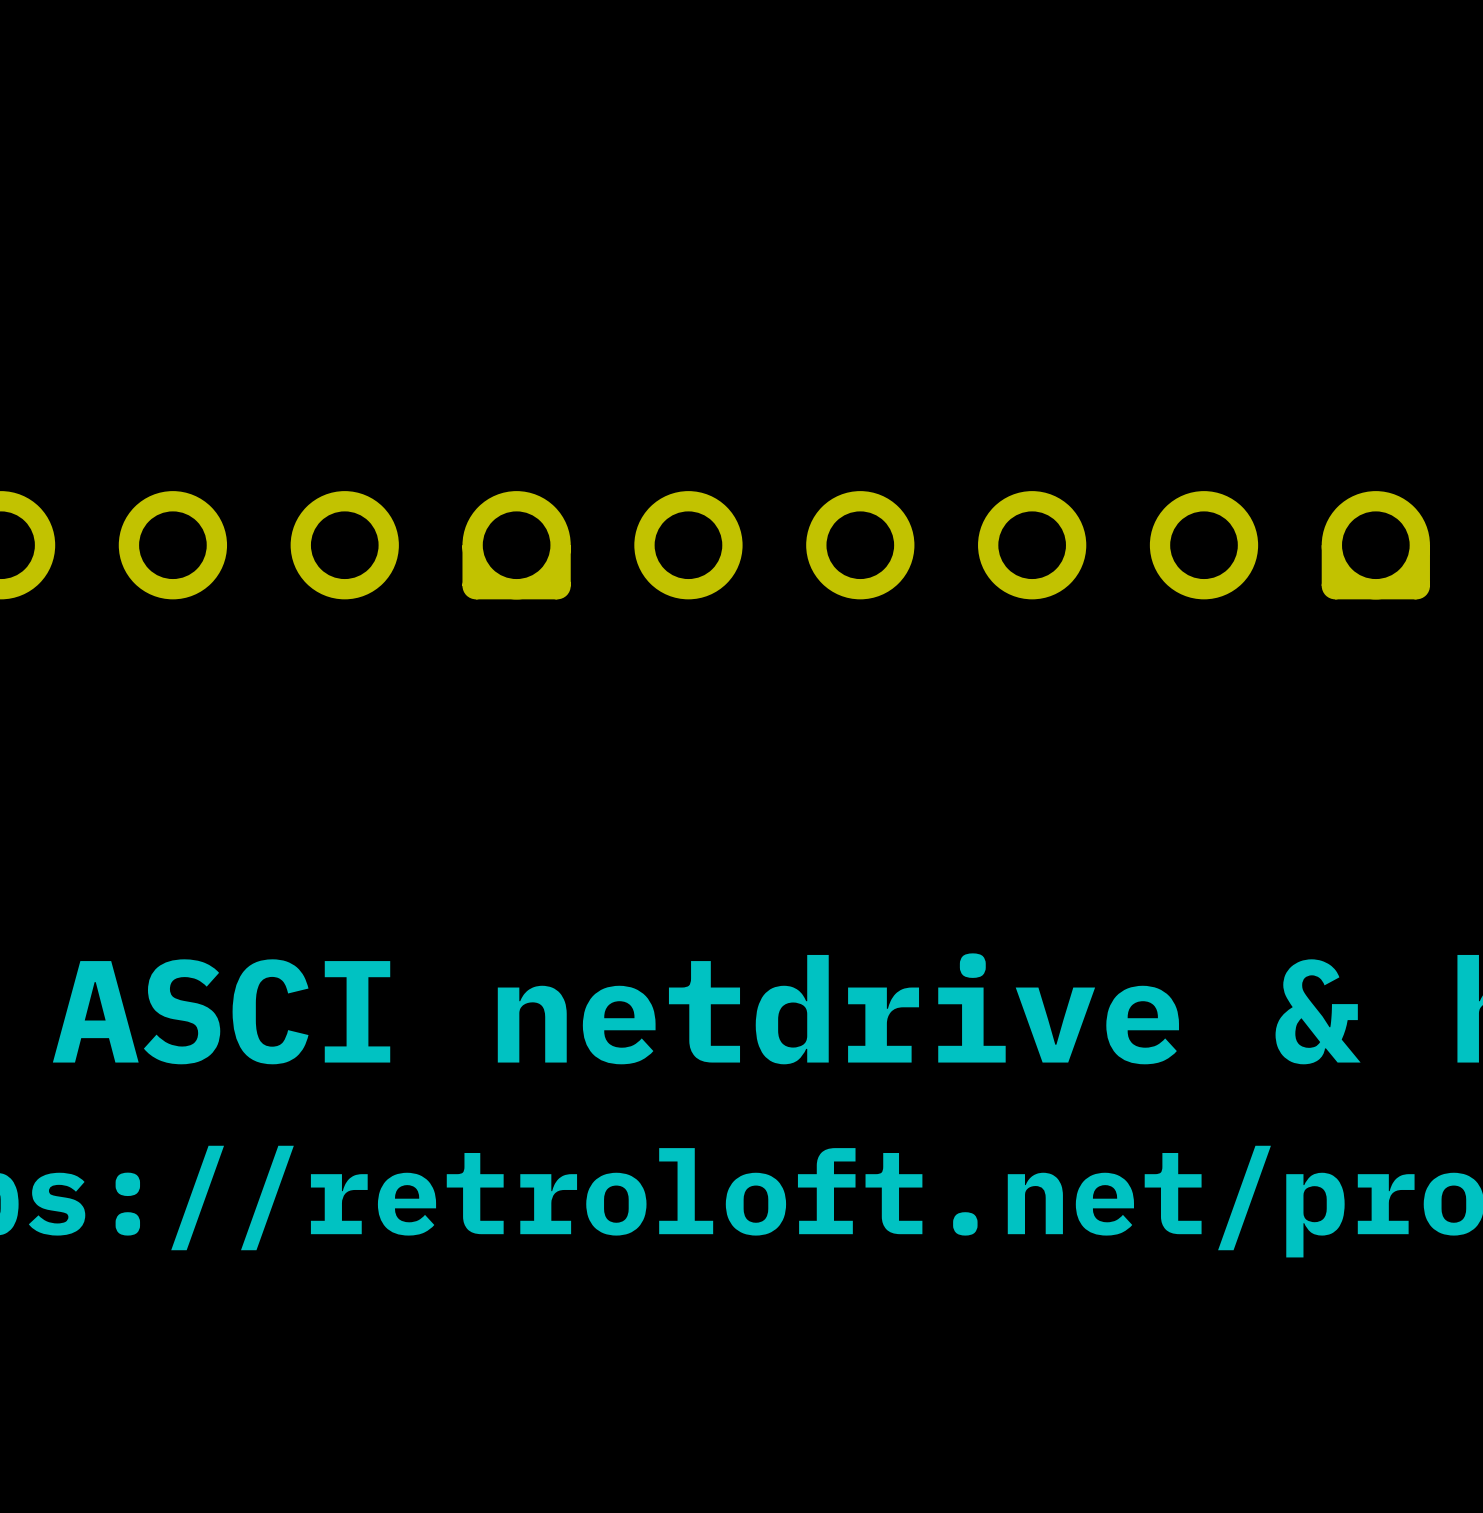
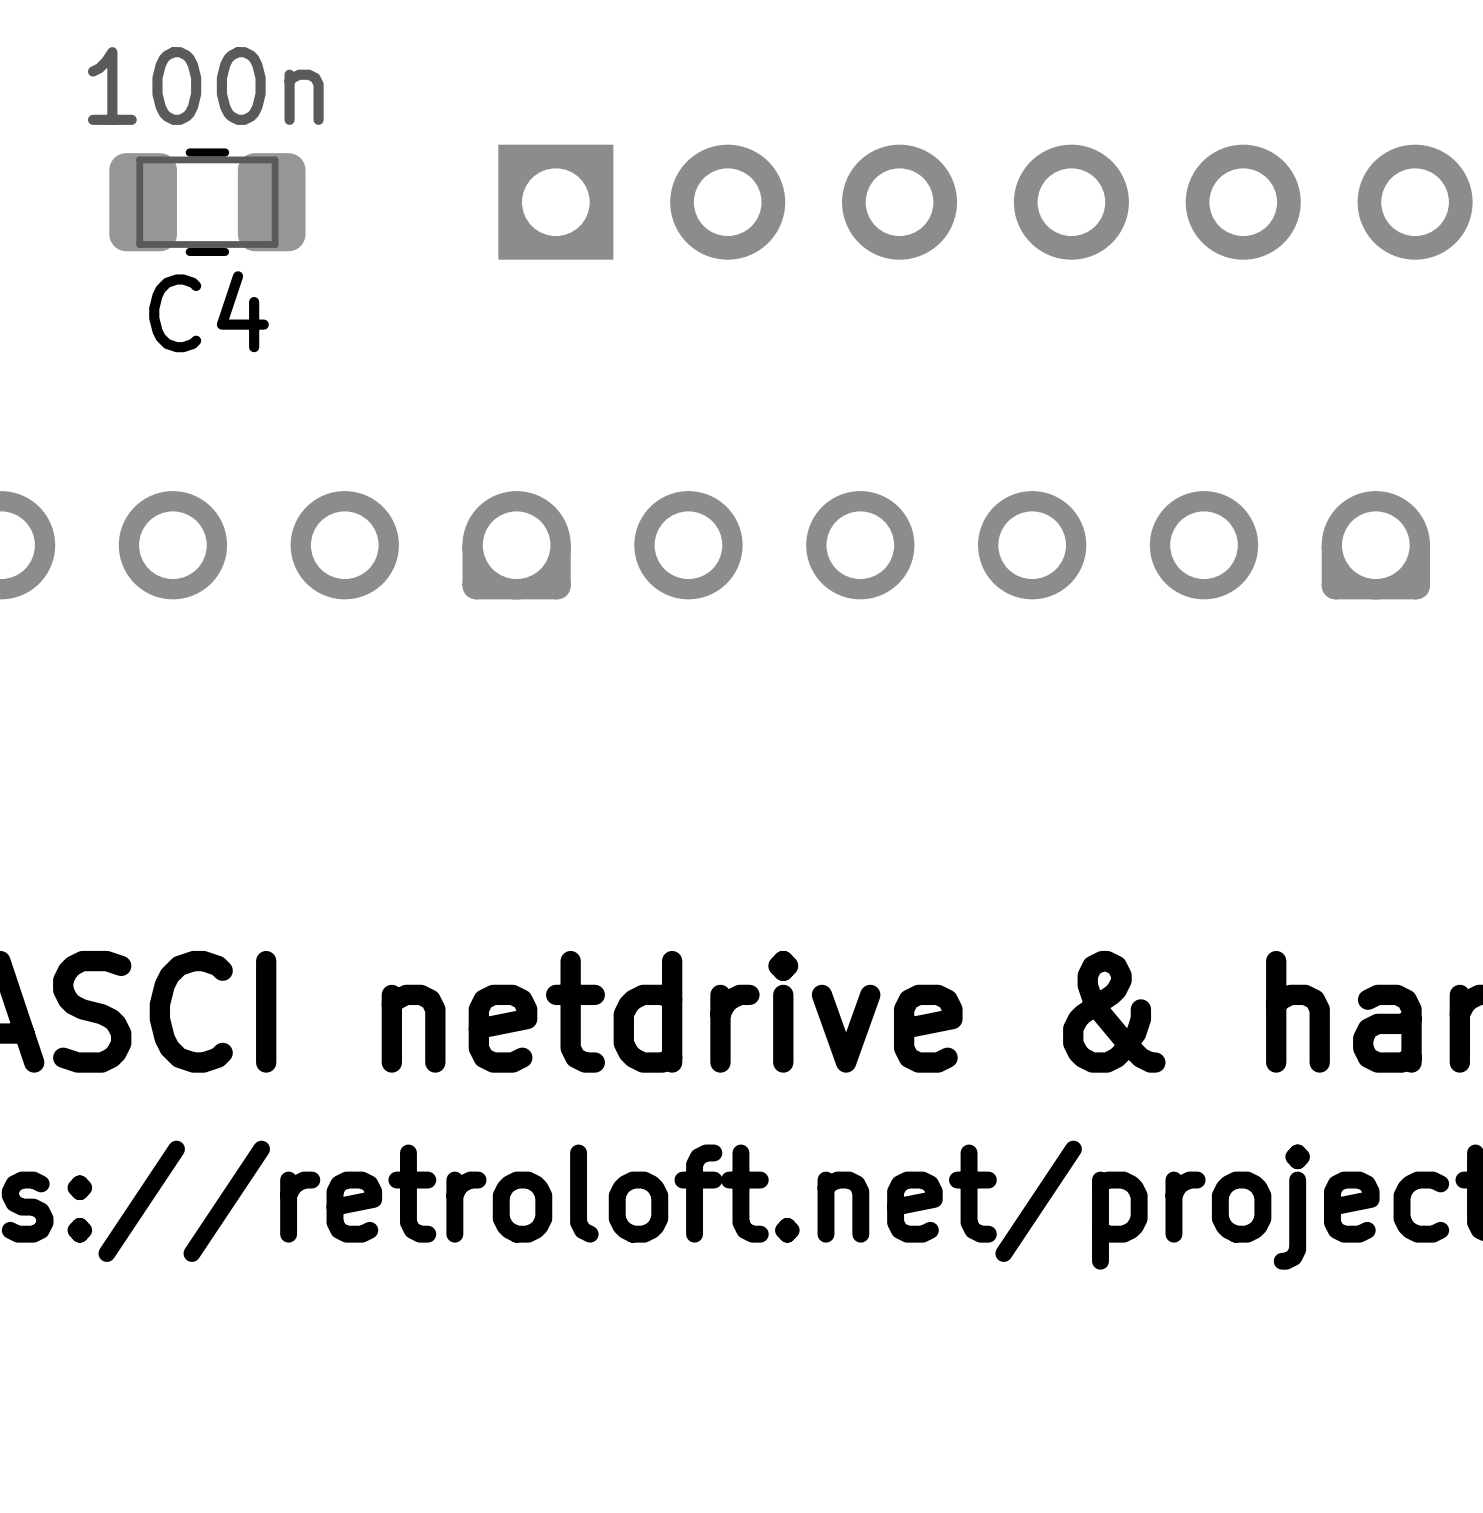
C4: none -> 100n (207, 202)
part: none -> (985, 202)

